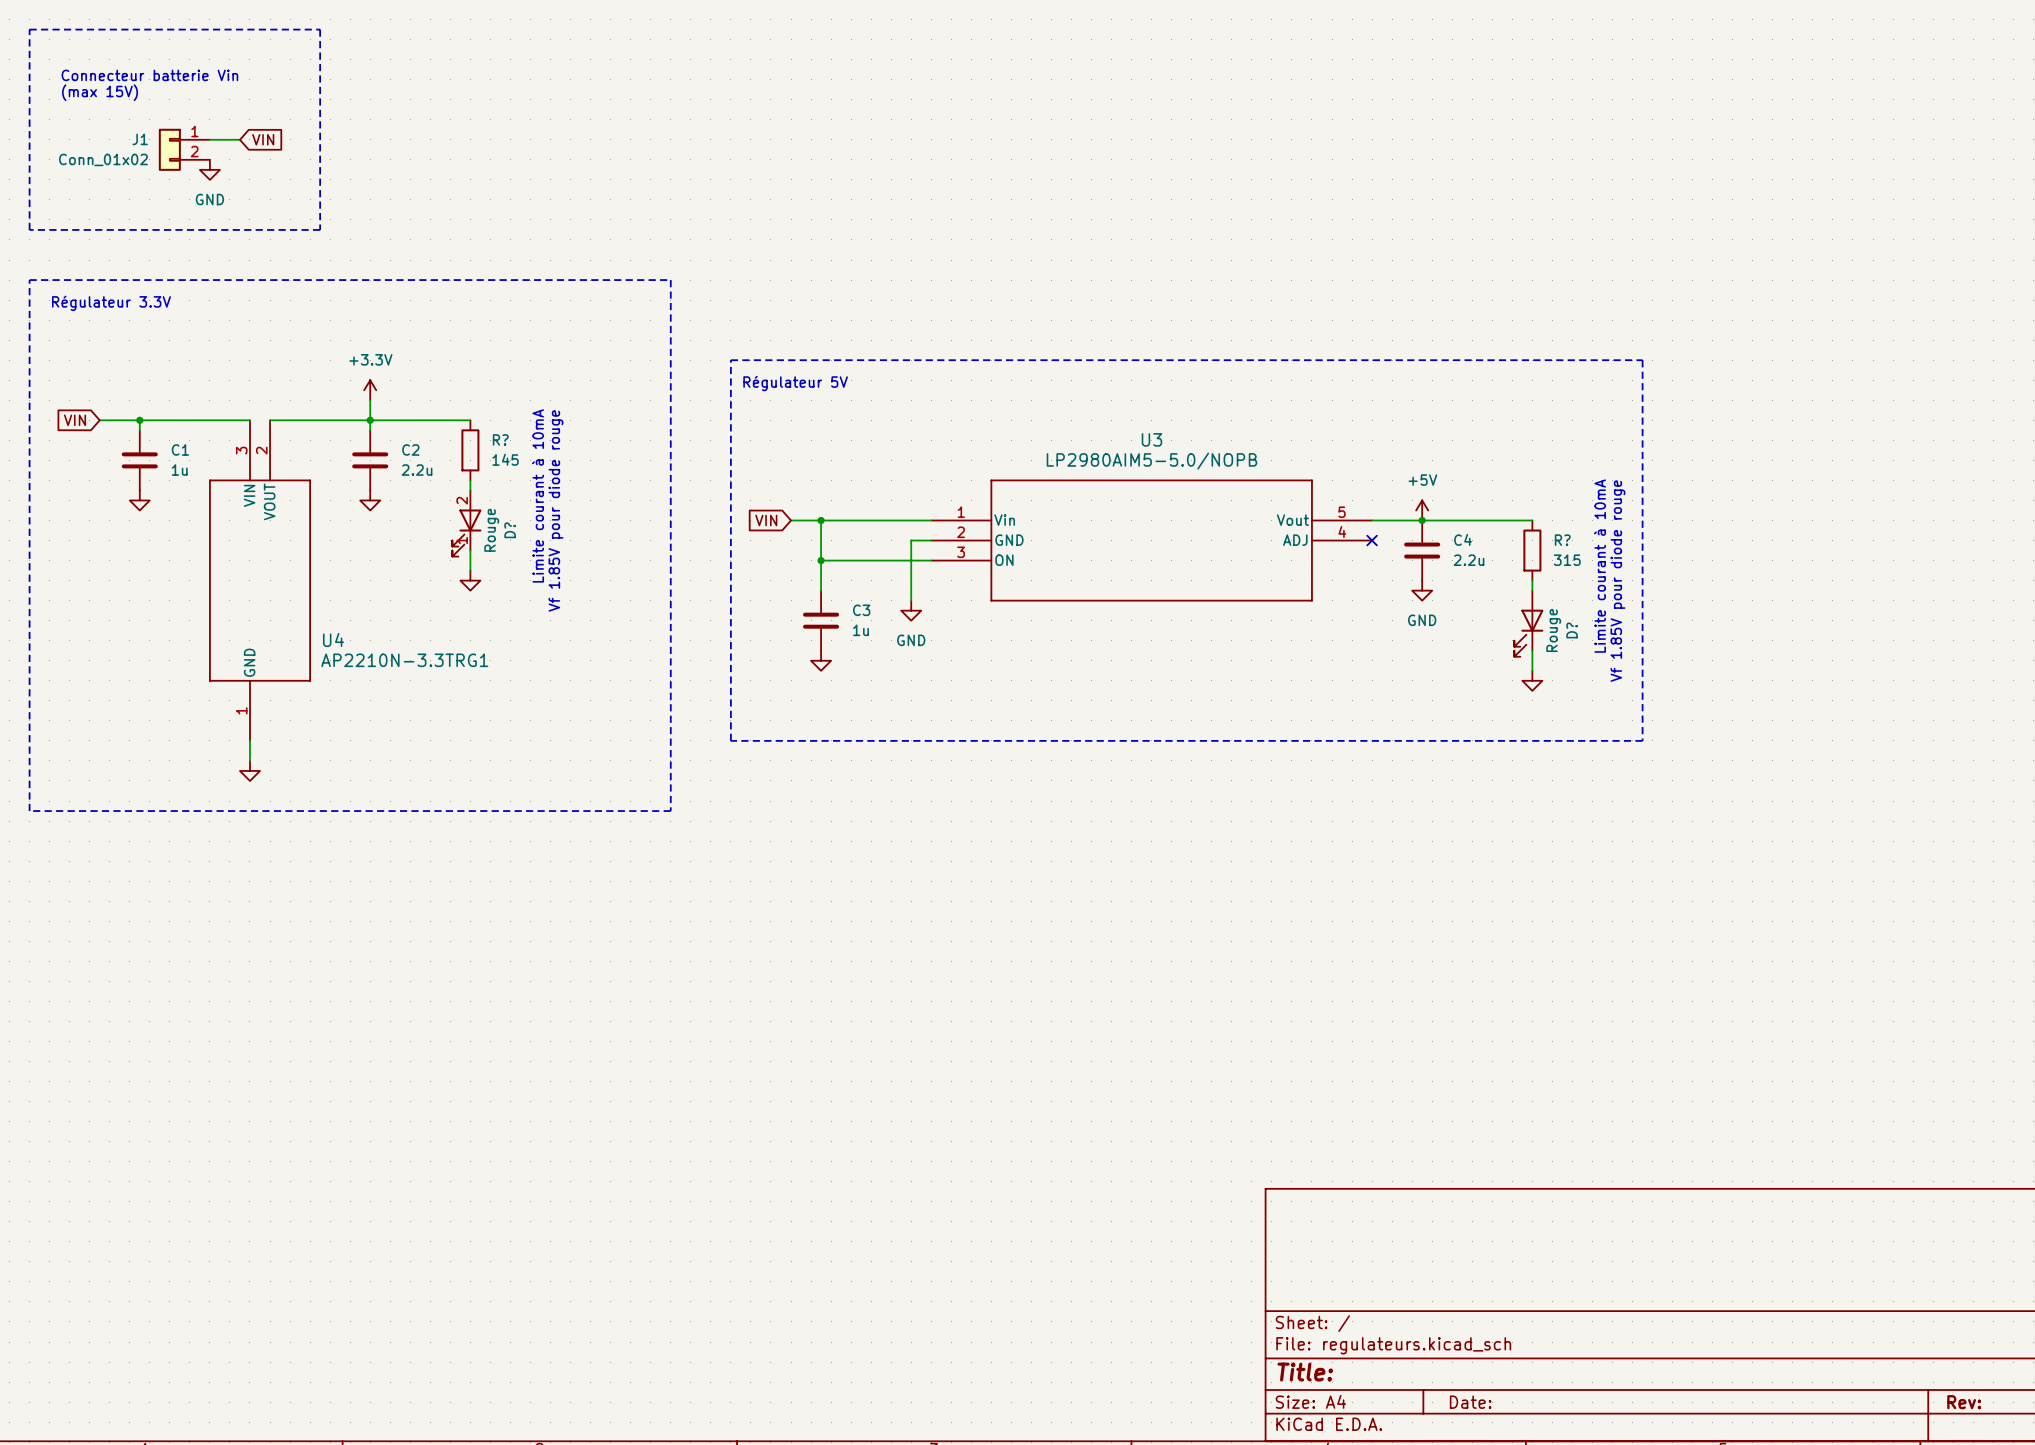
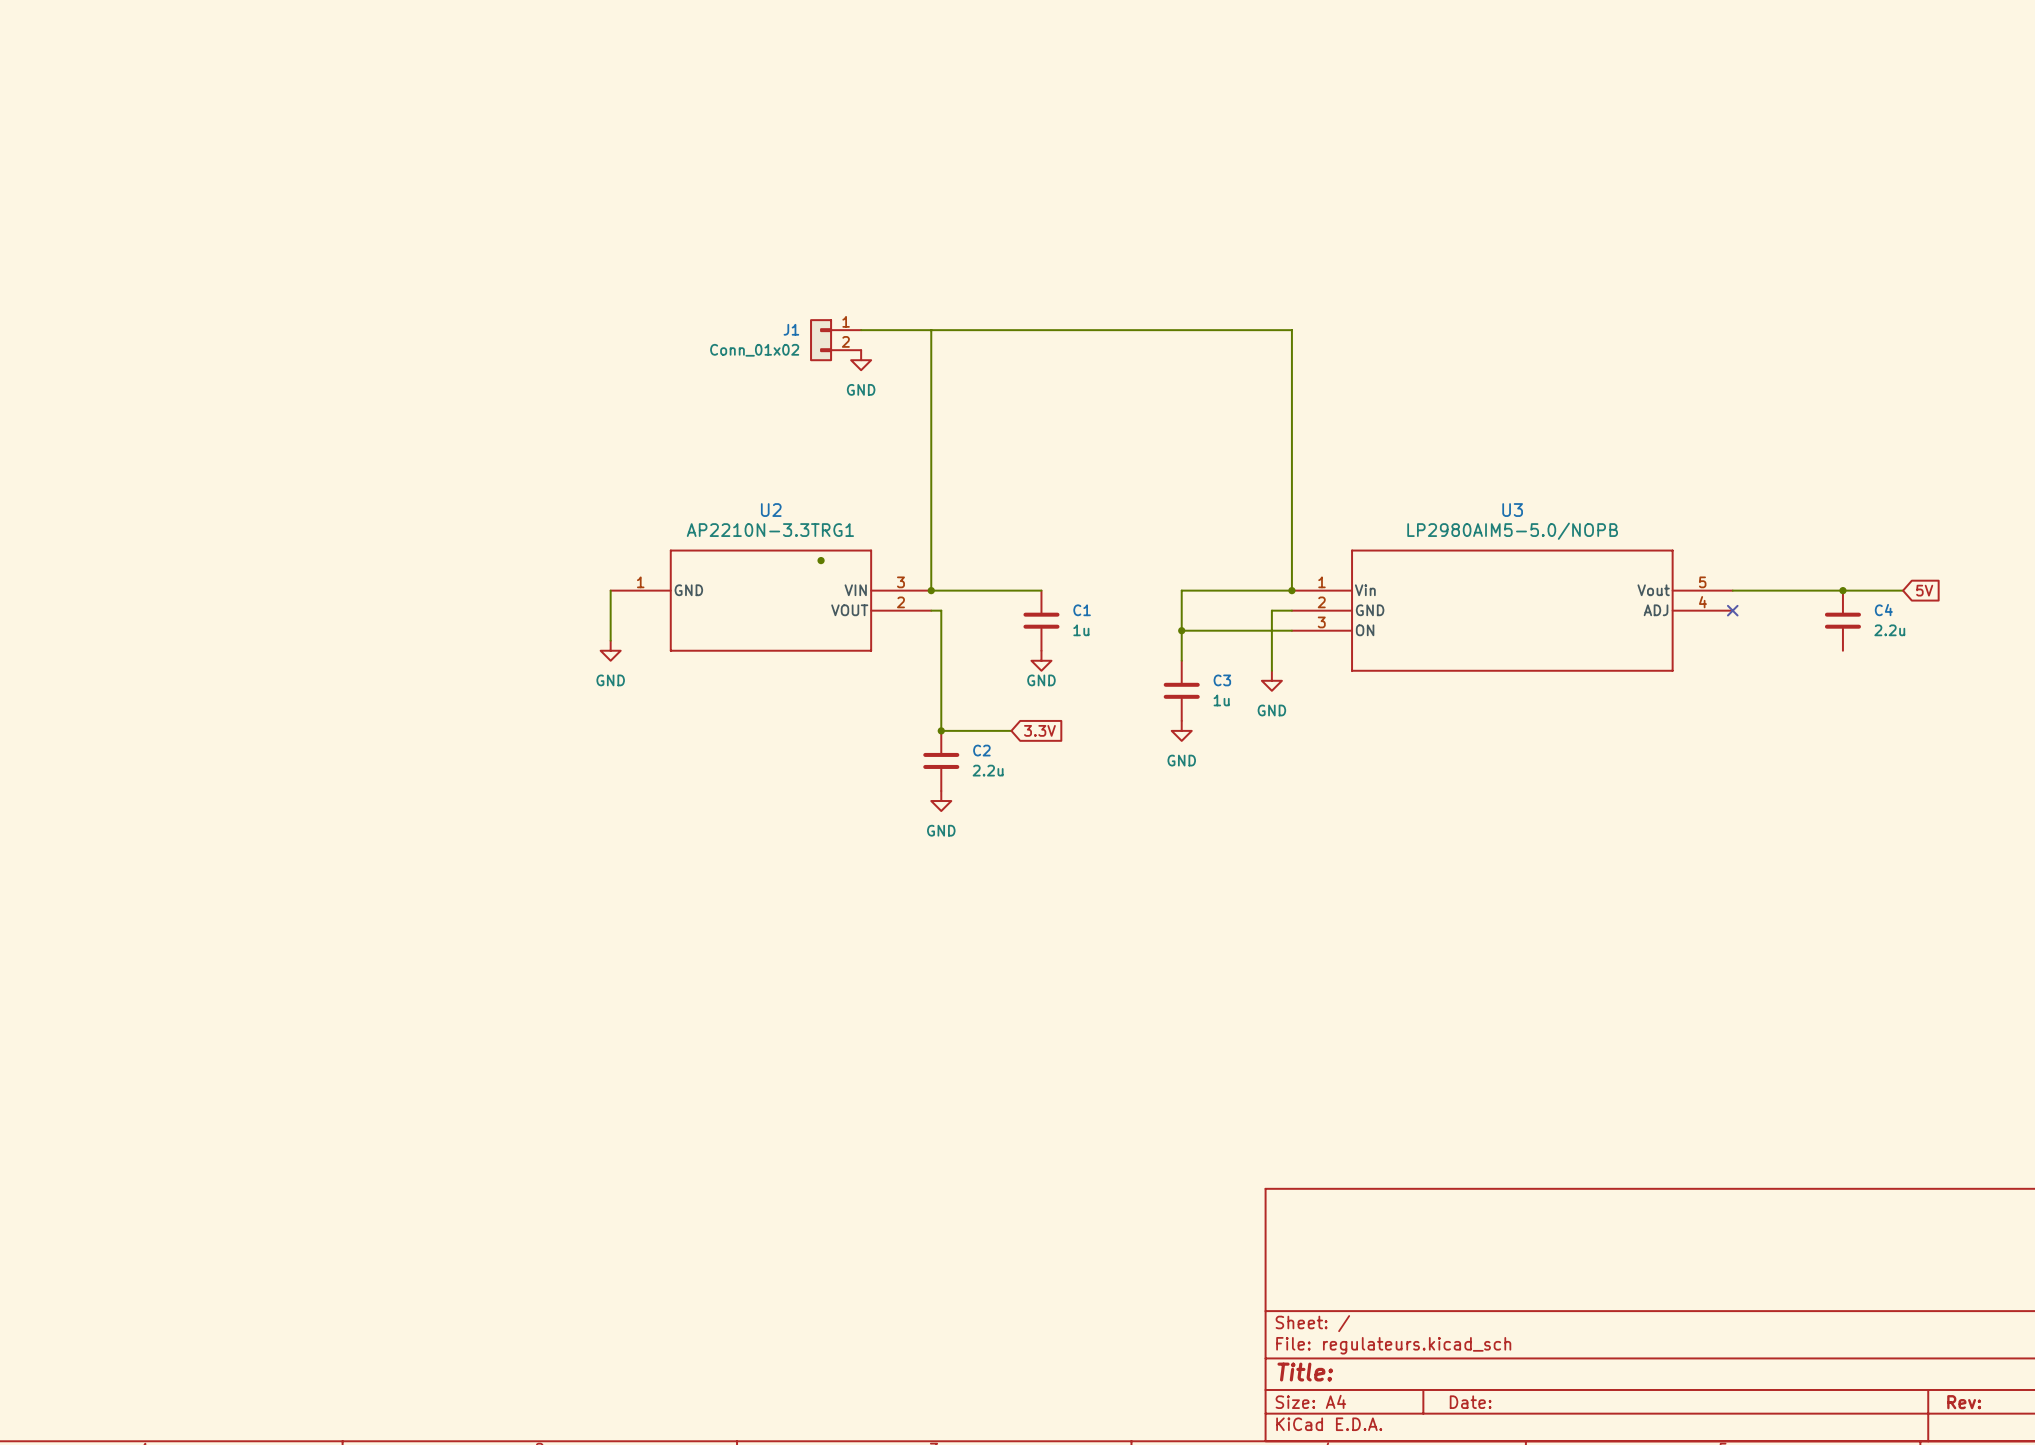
line: (29, 29) (29, 229) (320, 229) (320, 29) (29, 29) -> none
text: Connecteur batterie Vin (149, 75) -> none
text: (max 15V) (100, 92) -> none
wire: (209, 139) (239, 139) -> none
global label: VIN (263, 139) -> none
J1 position: (184, 149) -> (835, 340)
power symbol: GND (209, 169) -> none
line: (29, 280) (670, 280) (670, 811) (29, 811) (29, 280) -> none
text: Régulateur 3.3V (111, 303) -> none
wire: none -> (861, 330) (1291, 330) (1291, 590) (1181, 590) (1181, 660)
wire: none -> (931, 330) (931, 590) (1041, 590)
line: (730, 360) (1642, 360) (1642, 740) (730, 740) (730, 360) -> none
power symbol: none -> GND (861, 360)
text: Régulateur 5V (795, 383) -> none
power symbol: +3.3V (370, 390) -> none
wire: (370, 400) (370, 430) -> none
global label: VIN (75, 420) -> none
wire: (99, 420) (249, 420) -> none
wire: (139, 420) (139, 430) -> none
junction: (139, 420) -> none
wire: (270, 420) (470, 420) -> none
junction: (370, 420) -> none
R?: 145 (470, 450) -> none
C1 position: (139, 460) -> (1041, 620)
C2 position: (370, 460) -> (941, 760)
wire: (470, 480) (470, 490) -> none
text: Limite courant à 10mA (537, 495) -> none
power symbol: (139, 500) -> none
power symbol: (370, 500) -> none
text: Vf 1.85V pour diode rouge (556, 510) -> none
power symbol: +5V (1422, 510) -> none
global label: VIN (766, 520) -> none
wire: (791, 520) (931, 520) -> none
wire: (821, 520) (821, 590) -> none
junction: (821, 520) -> none
wire: (1372, 520) (1532, 520) -> none
junction: (1422, 520) -> none
D?: Rouge (466, 523) -> none
wire: (931, 540) (911, 540) (911, 600) -> none
U3 position: (1151, 540) -> (1512, 610)
no-connect mark: (1372, 540) -> none
wire: (470, 550) (470, 570) -> none
C4 position: (1422, 550) -> (1842, 620)
R?: 315 (1532, 550) -> none
wire: (821, 560) (931, 560) -> none
text: Limite courant à 10mA (1599, 566) -> none
U4: AP2210N-3.3TRG1 (260, 580) -> none
power symbol: (470, 580) -> none
wire: (1532, 580) (1532, 590) -> none
text: Vf 1.85V pour diode rouge (1617, 581) -> none
wire: none -> (610, 590) (610, 640)
junction: none -> (931, 590)
junction: none -> (1291, 590)
power symbol: GND (1422, 590) -> none
wire: none -> (1732, 590) (1903, 590)
junction: none -> (1842, 590)
global label: none -> 5V (1924, 590)
U2: none -> AP2210N-3.3TRG1 (770, 600)
power symbol: GND (911, 610) -> none
wire: none -> (931, 610) (941, 610) (941, 730) (1011, 730)
wire: none -> (1291, 610) (1271, 610) (1271, 670)
no-connect mark: none -> (1732, 610)
C3 position: (821, 620) -> (1181, 690)
D?: Rouge (1528, 623) -> none
wire: none -> (1181, 630) (1291, 630)
junction: none -> (1181, 630)
power symbol: none -> GND (610, 650)
wire: (1532, 650) (1532, 670) -> none
power symbol: (821, 660) -> none
power symbol: none -> GND (1041, 660)
power symbol: none -> GND (1271, 680)
power symbol: (1532, 680) -> none
junction: none -> (941, 730)
global label: none -> 3.3V (1039, 730)
power symbol: none -> GND (1181, 730)
wire: (249, 740) (249, 760) -> none
power symbol: (249, 770) -> none
power symbol: none -> GND (941, 801)

